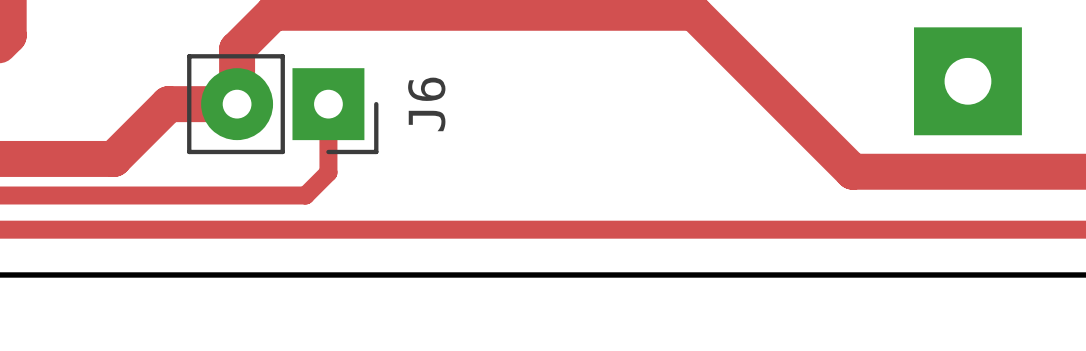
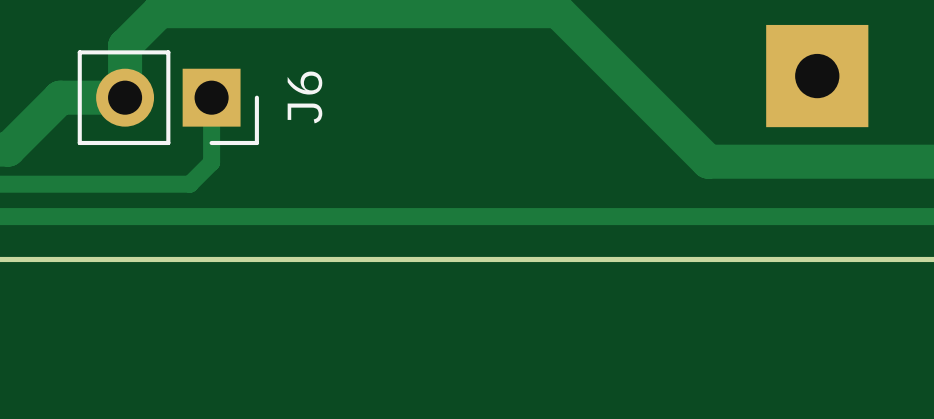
J6 footprint: [187, 54, 379, 155] -> [77, 50, 259, 146]

